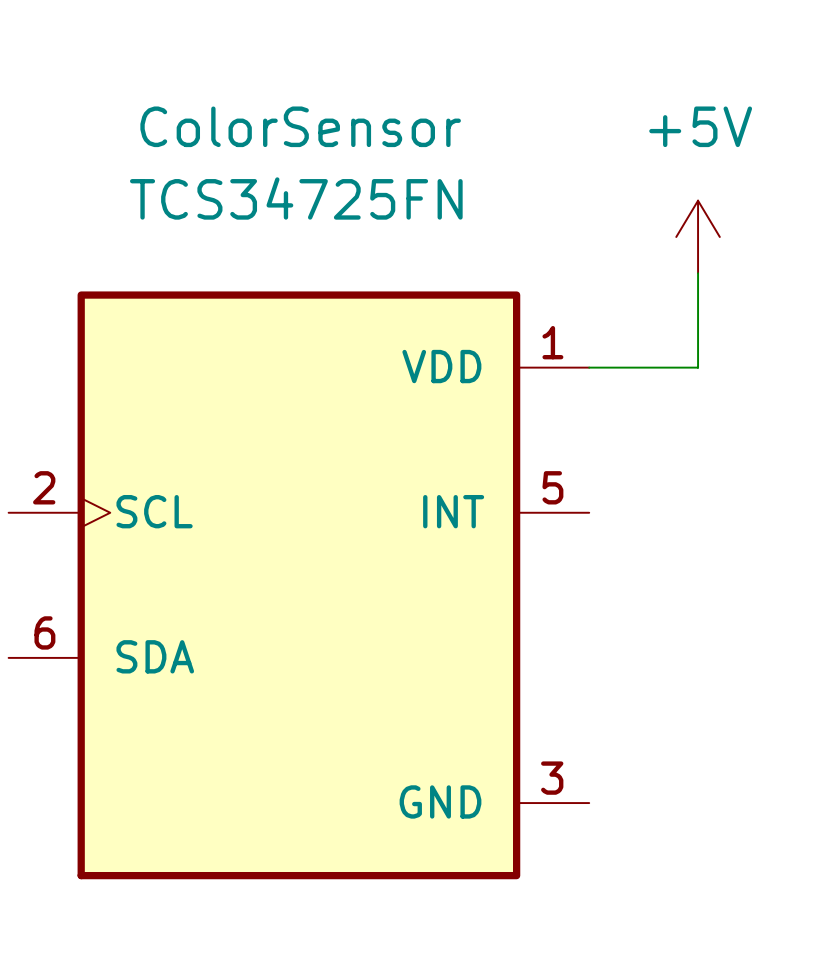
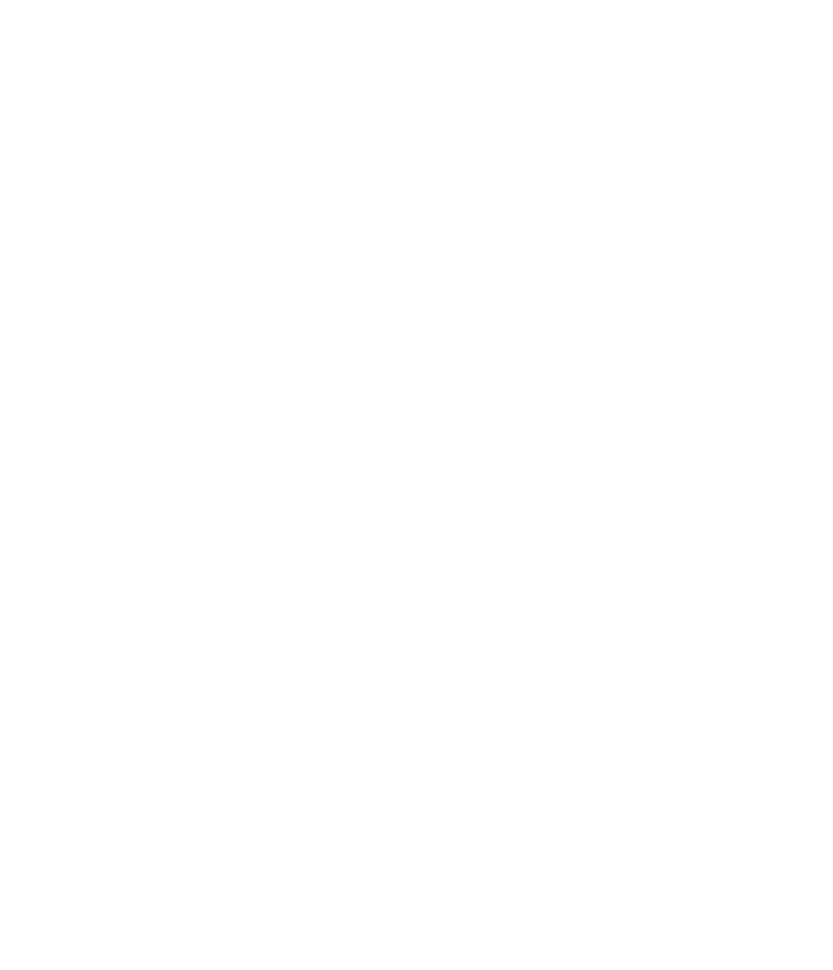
power symbol: +5V (698, 237) -> none
wire: (698, 273) (698, 367) (589, 367) -> none
ColorSensor: TCS34725FN (298, 585) -> none

